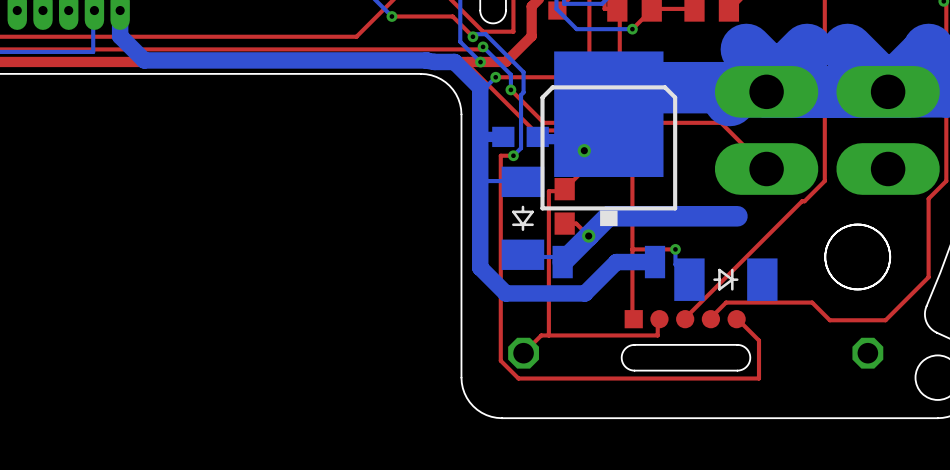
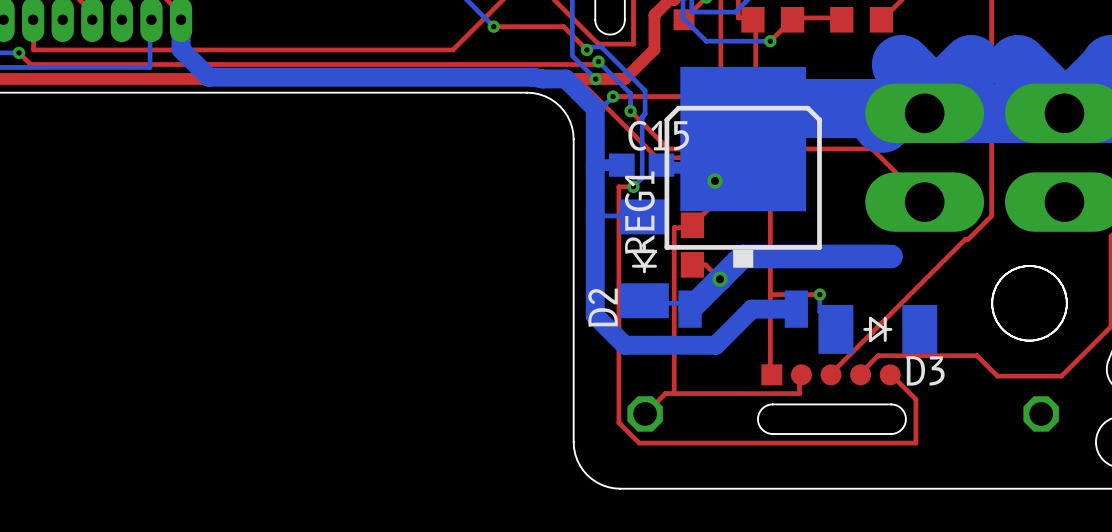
C15 name: none -> C15 (658, 135)
REG1 name: none -> REG1 (639, 212)
D2 name: none -> D2 (603, 307)
D3 name: none -> D3 (925, 370)

